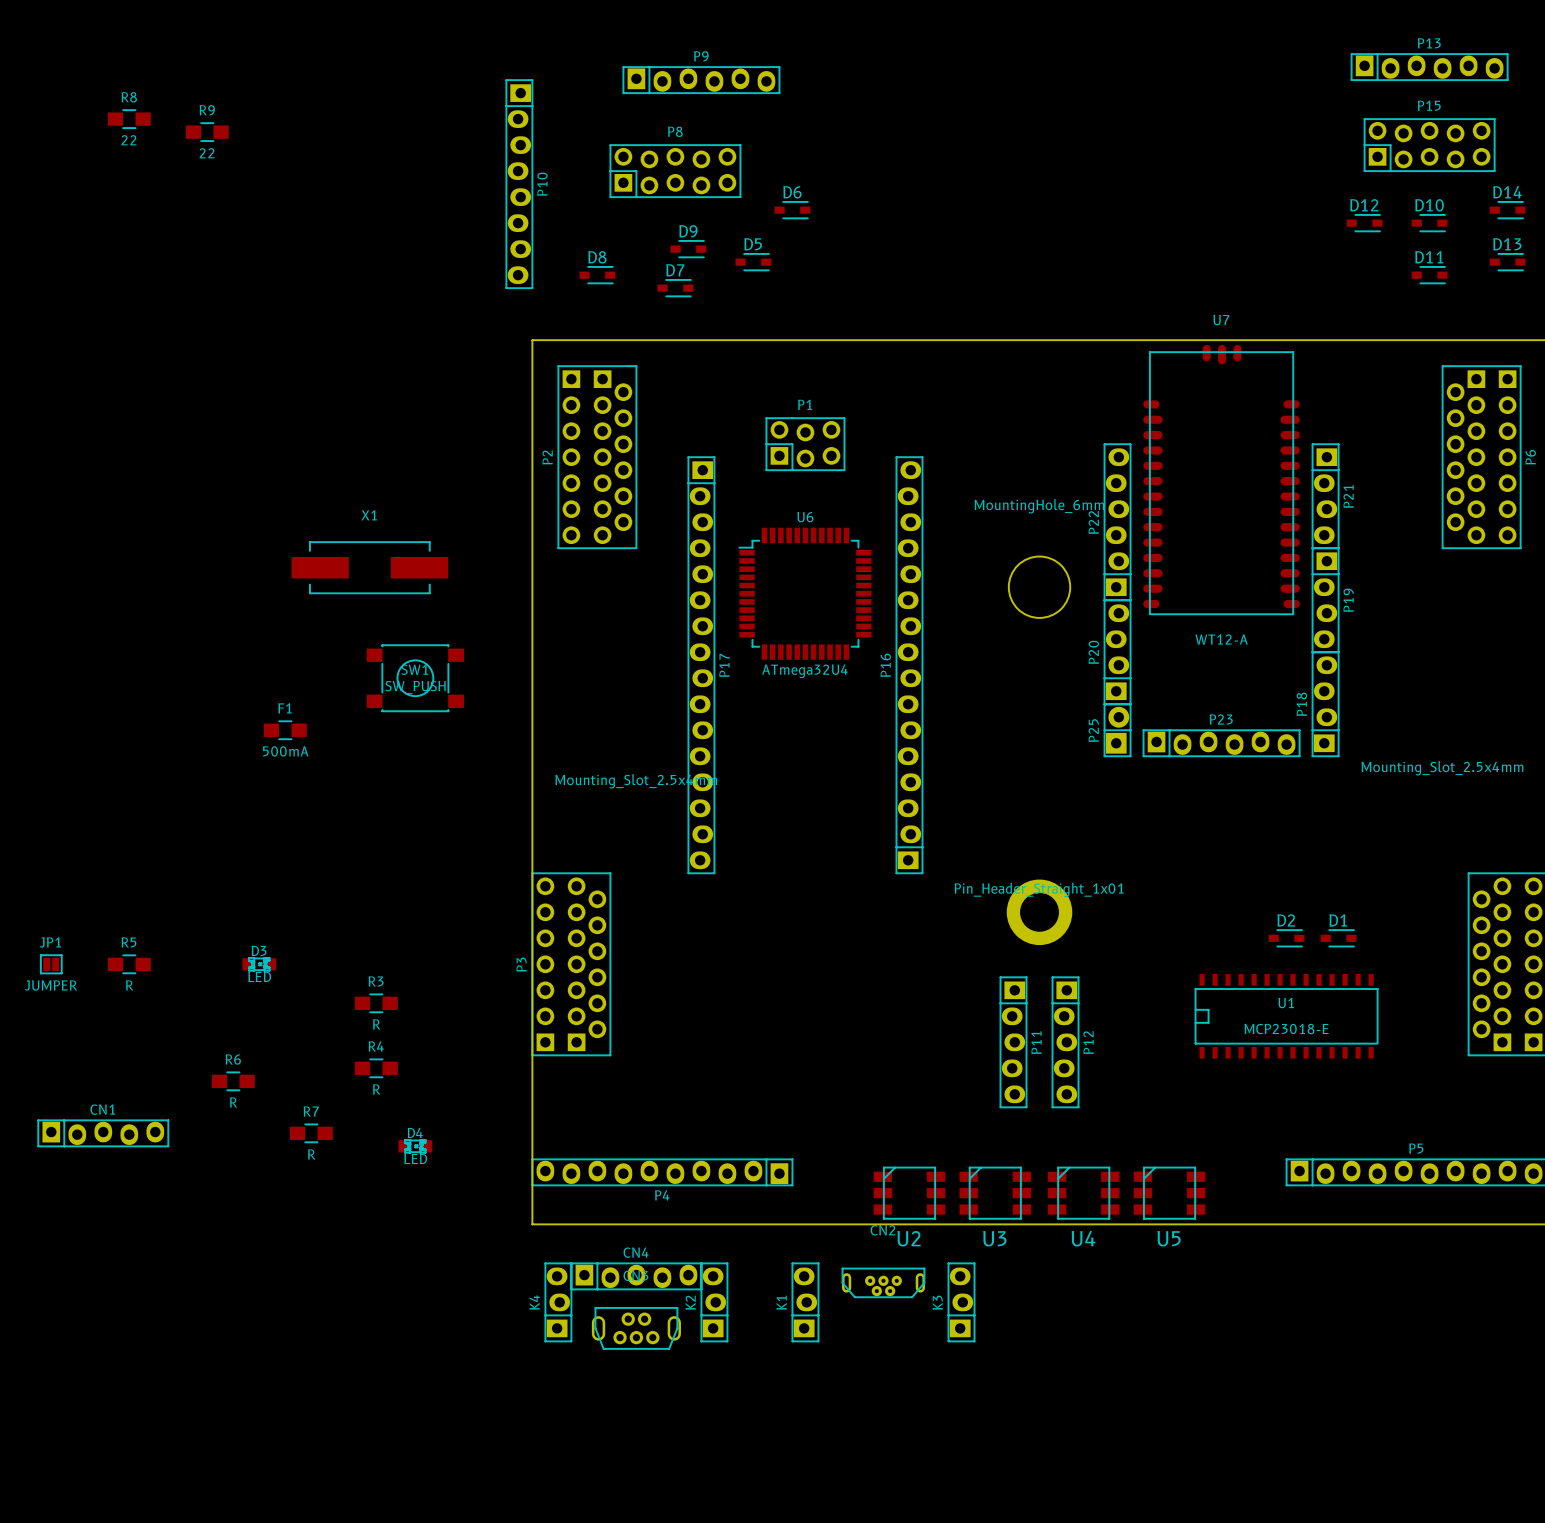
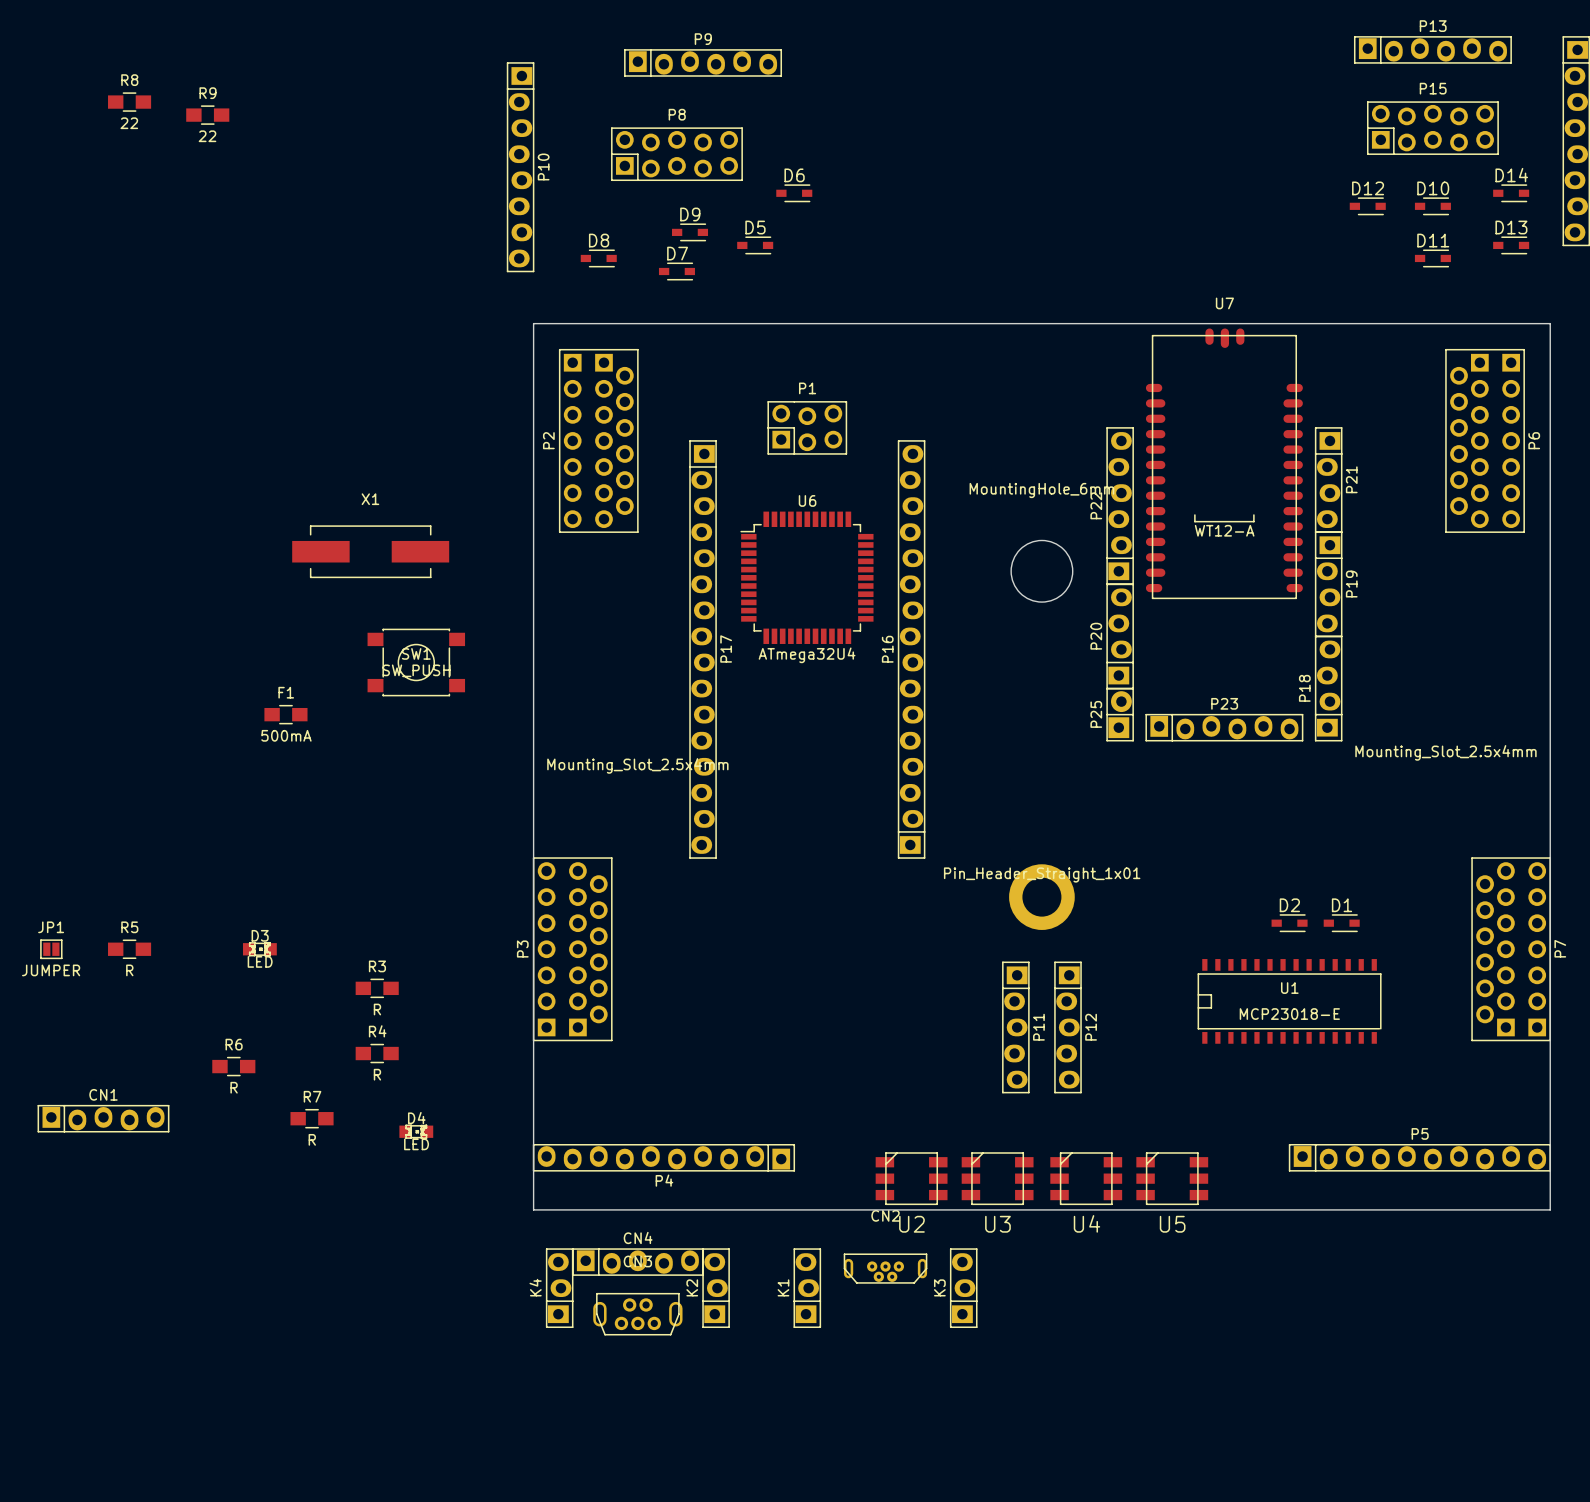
U7 footprint: [1143, 344, 1300, 616] -> [1145, 328, 1303, 600]
U7 value position: WT12-A (1221, 639) -> WT12-A (1224, 530)

